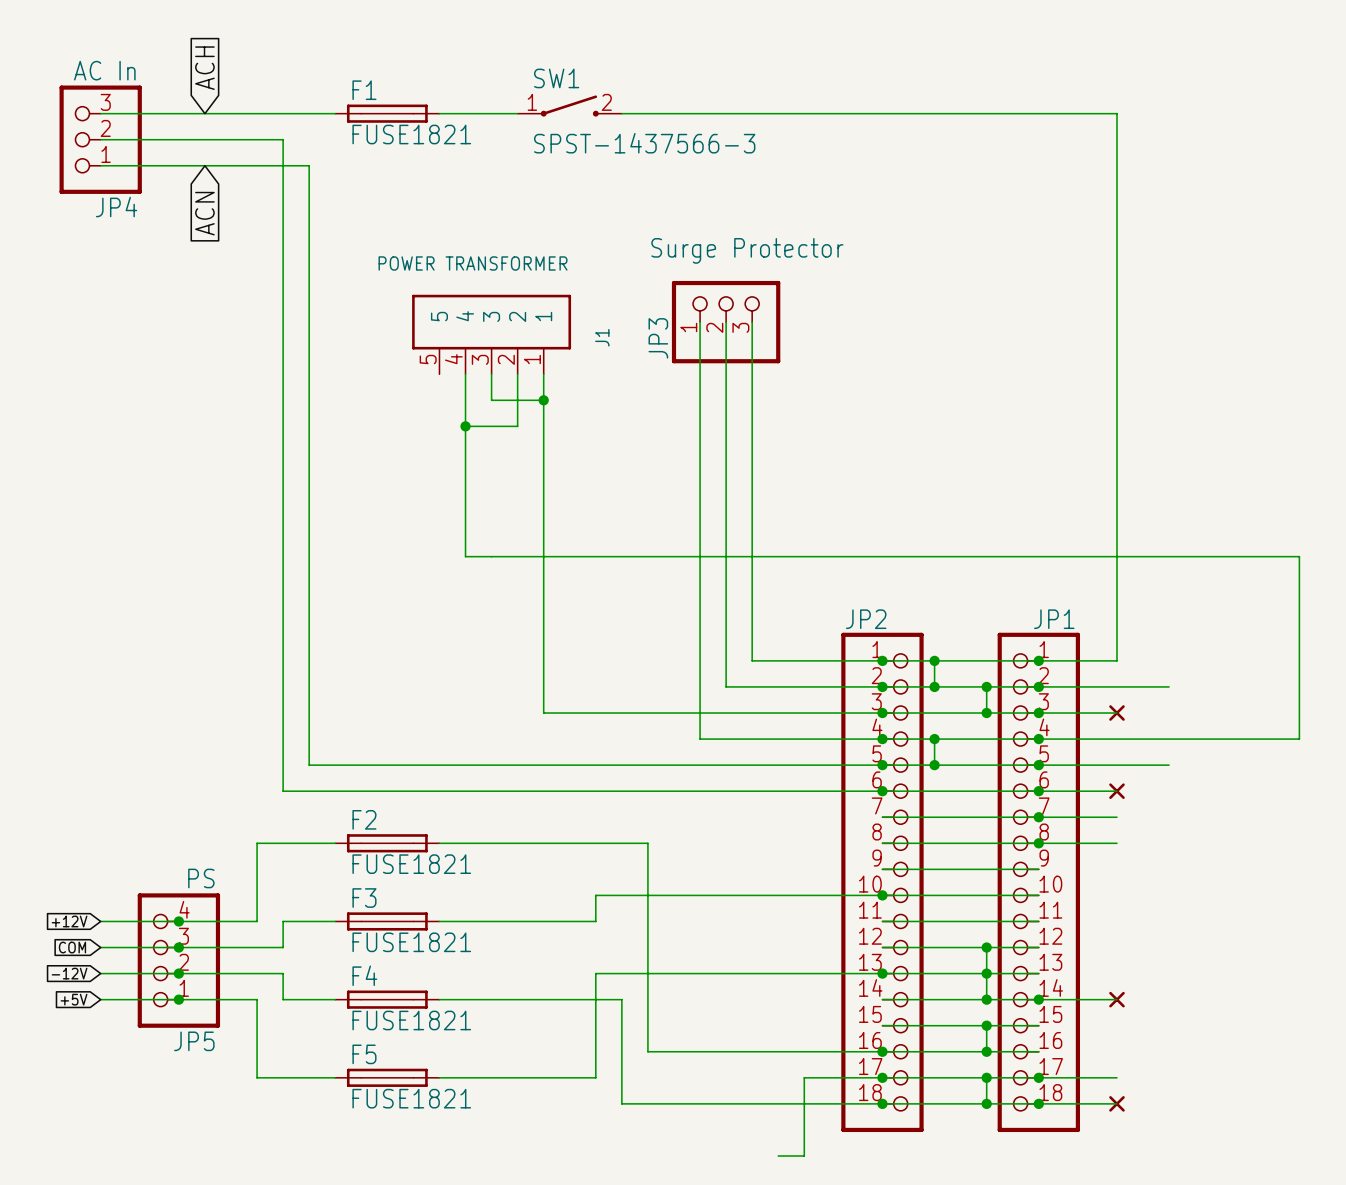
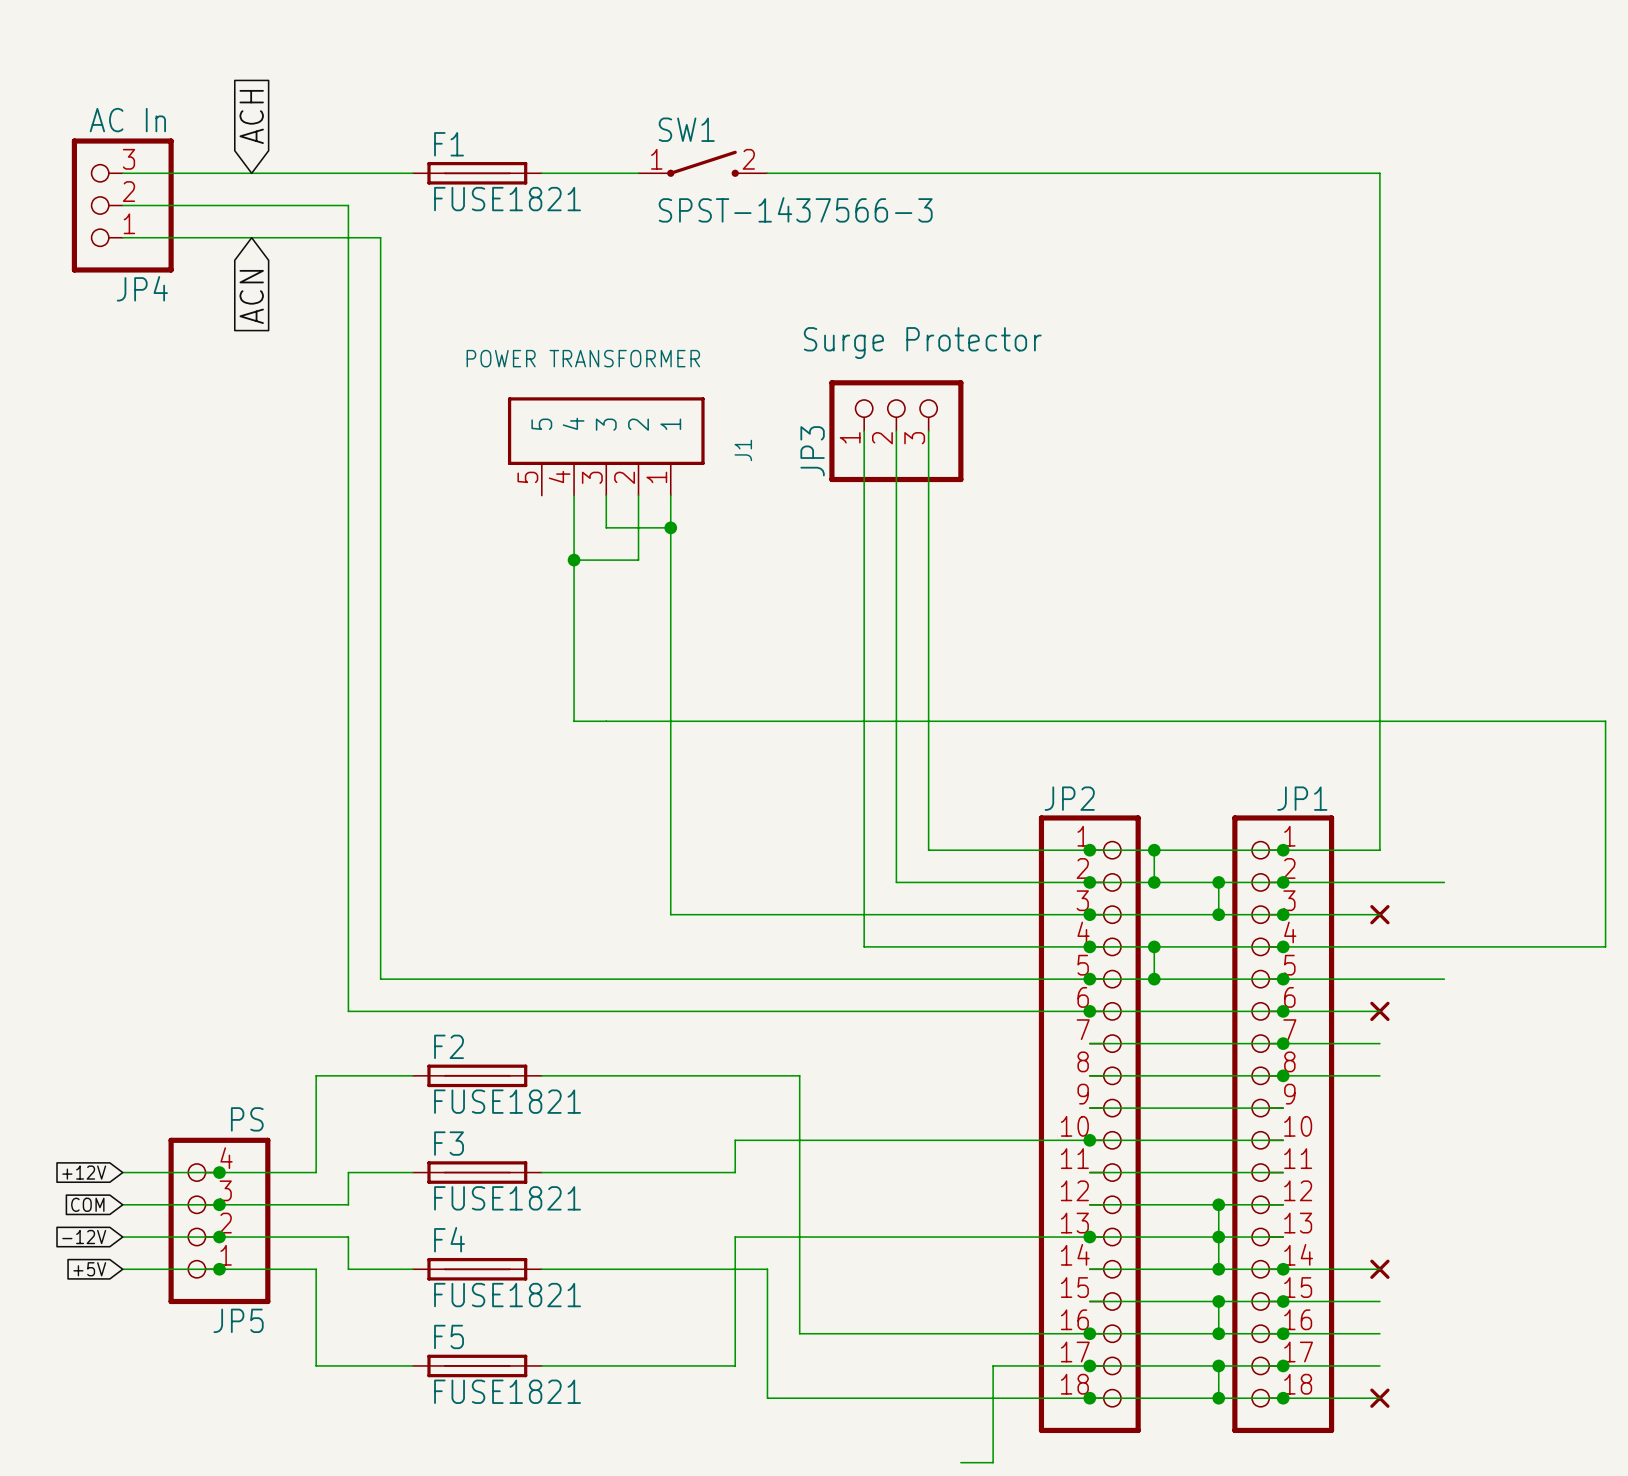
wire: none -> (1283, 1301) (1379, 1301)
junction: none -> (1283, 1301)
wire: none -> (1283, 1333) (1379, 1333)
junction: none -> (1283, 1333)

